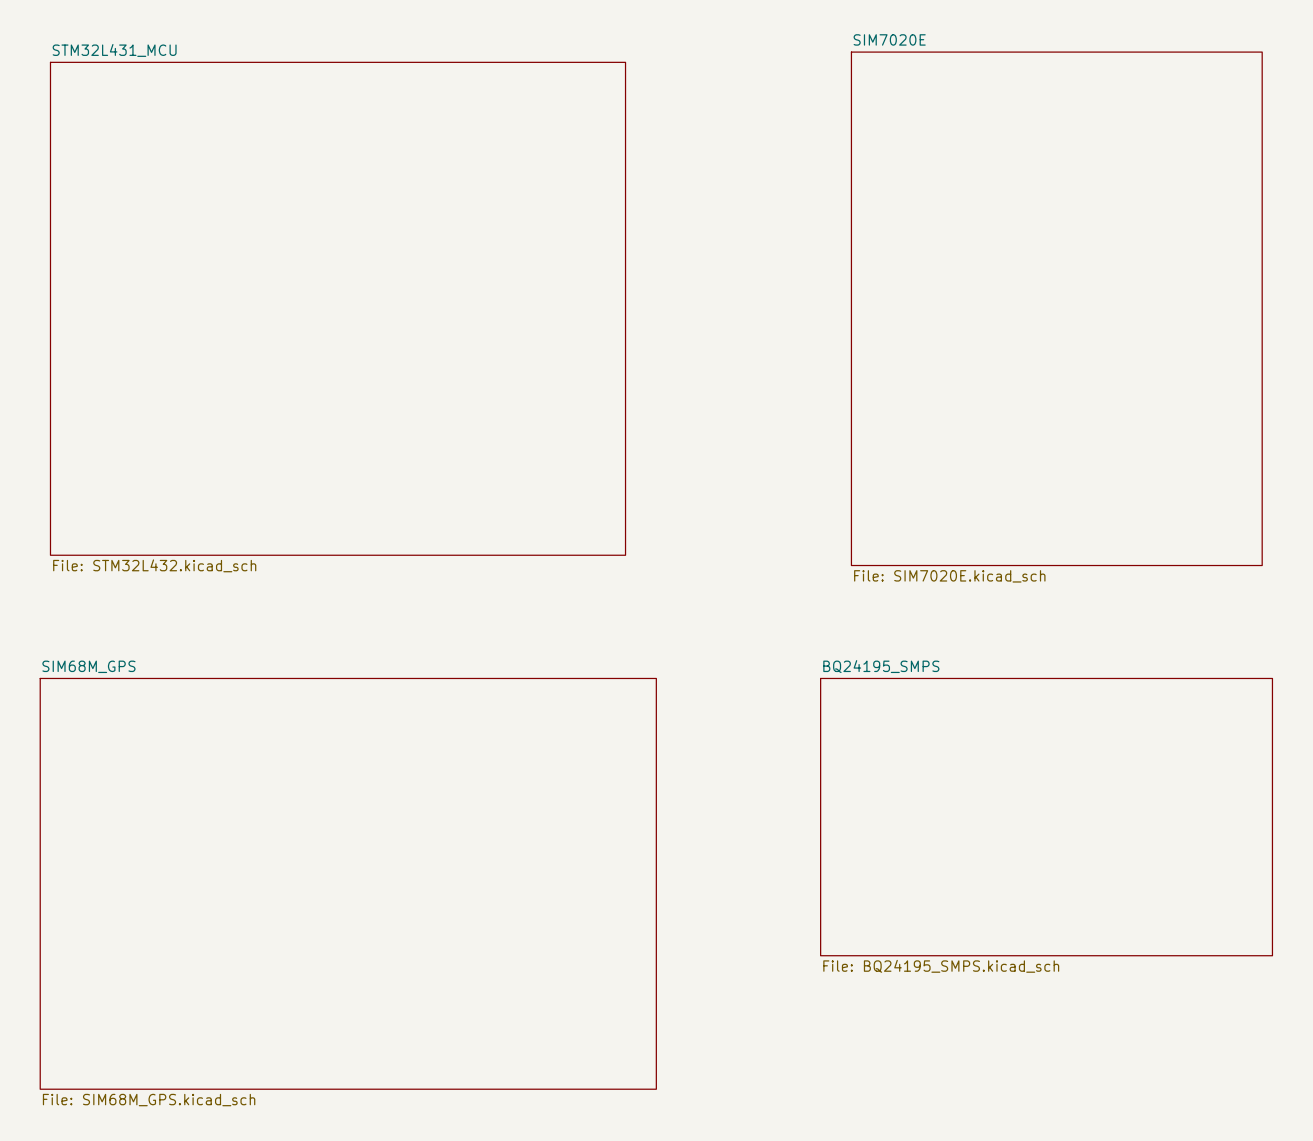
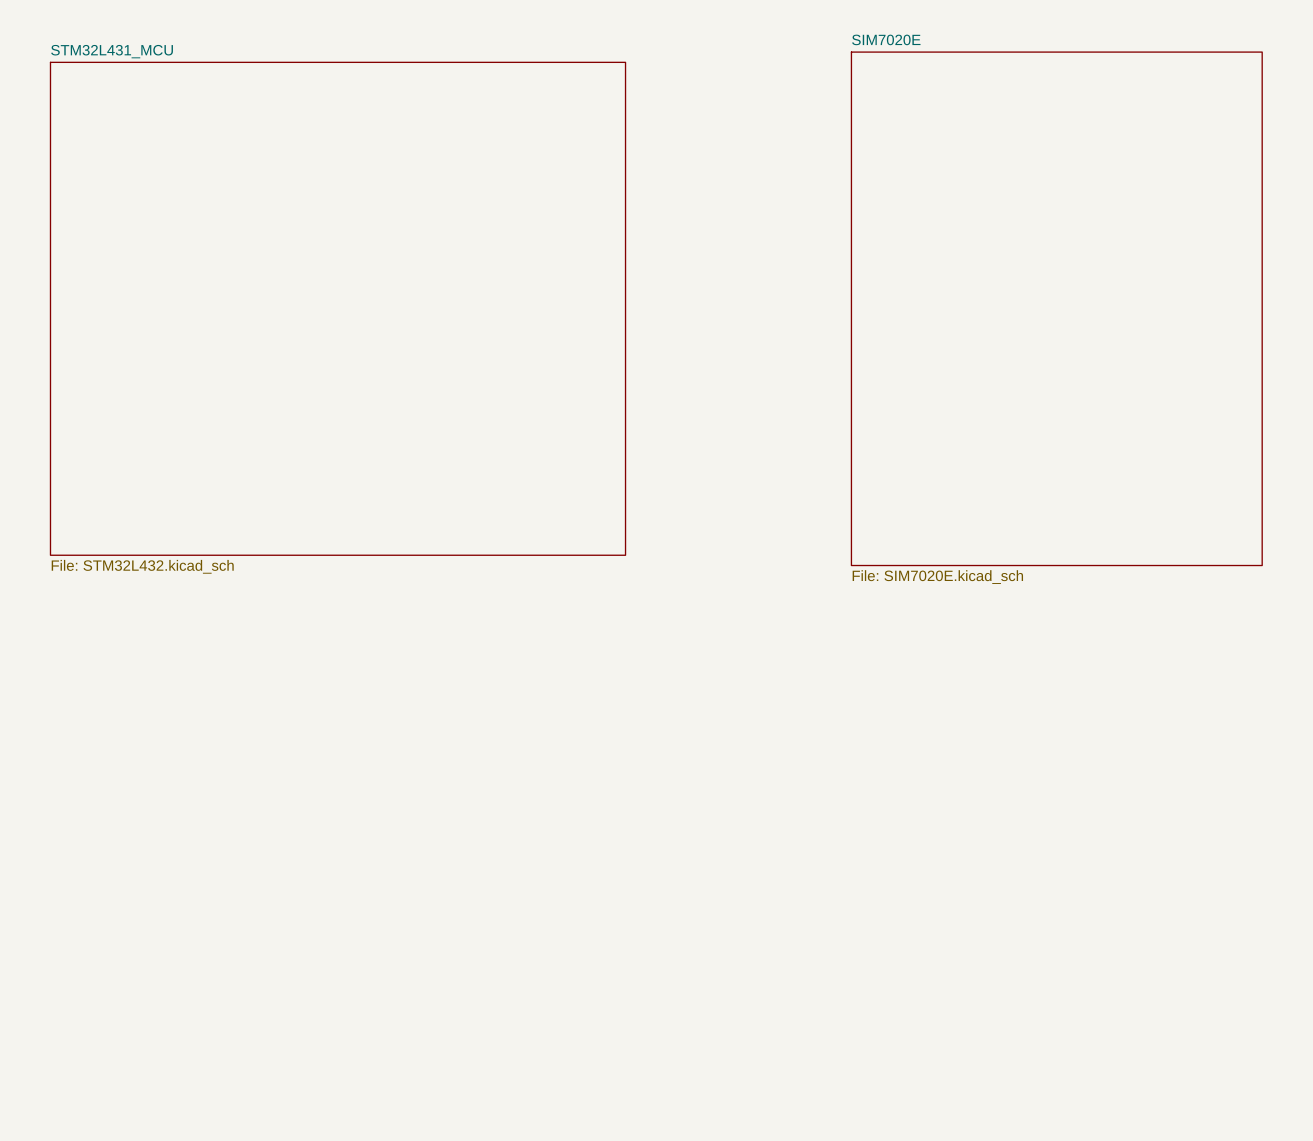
sheet BQ24195_SMPS: File: BQ24195_SMPS.kicad_sch (1046, 817) -> none
sheet SIM68M_GPS: File: SIM68M_GPS.kicad_sch (348, 883) -> none

